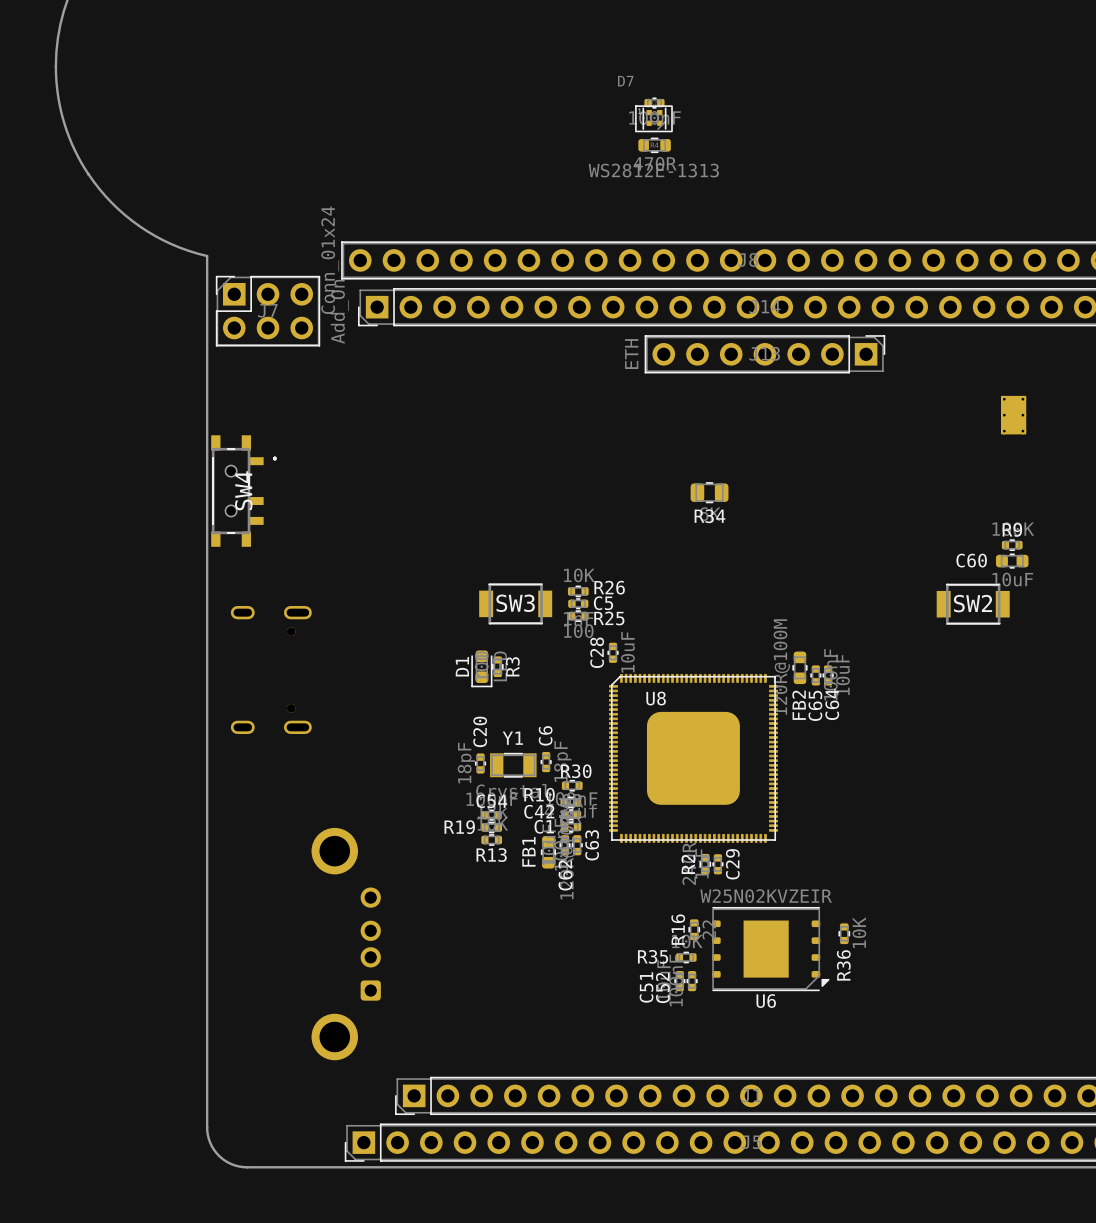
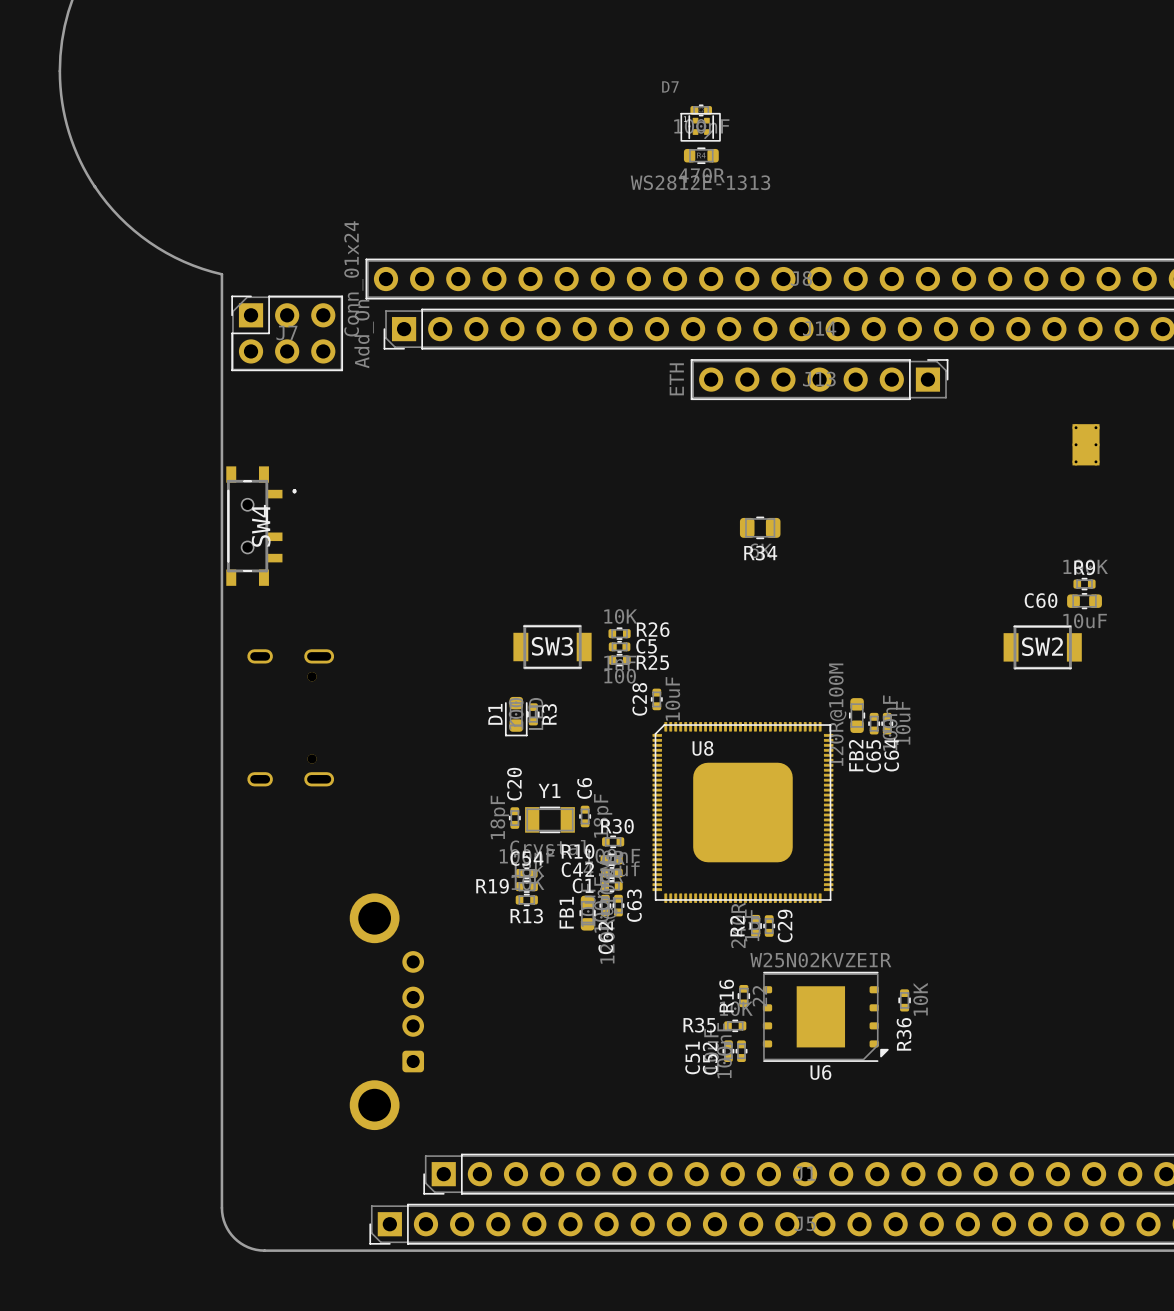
part: (346, 944) -> none
part: none -> (386, 1011)

